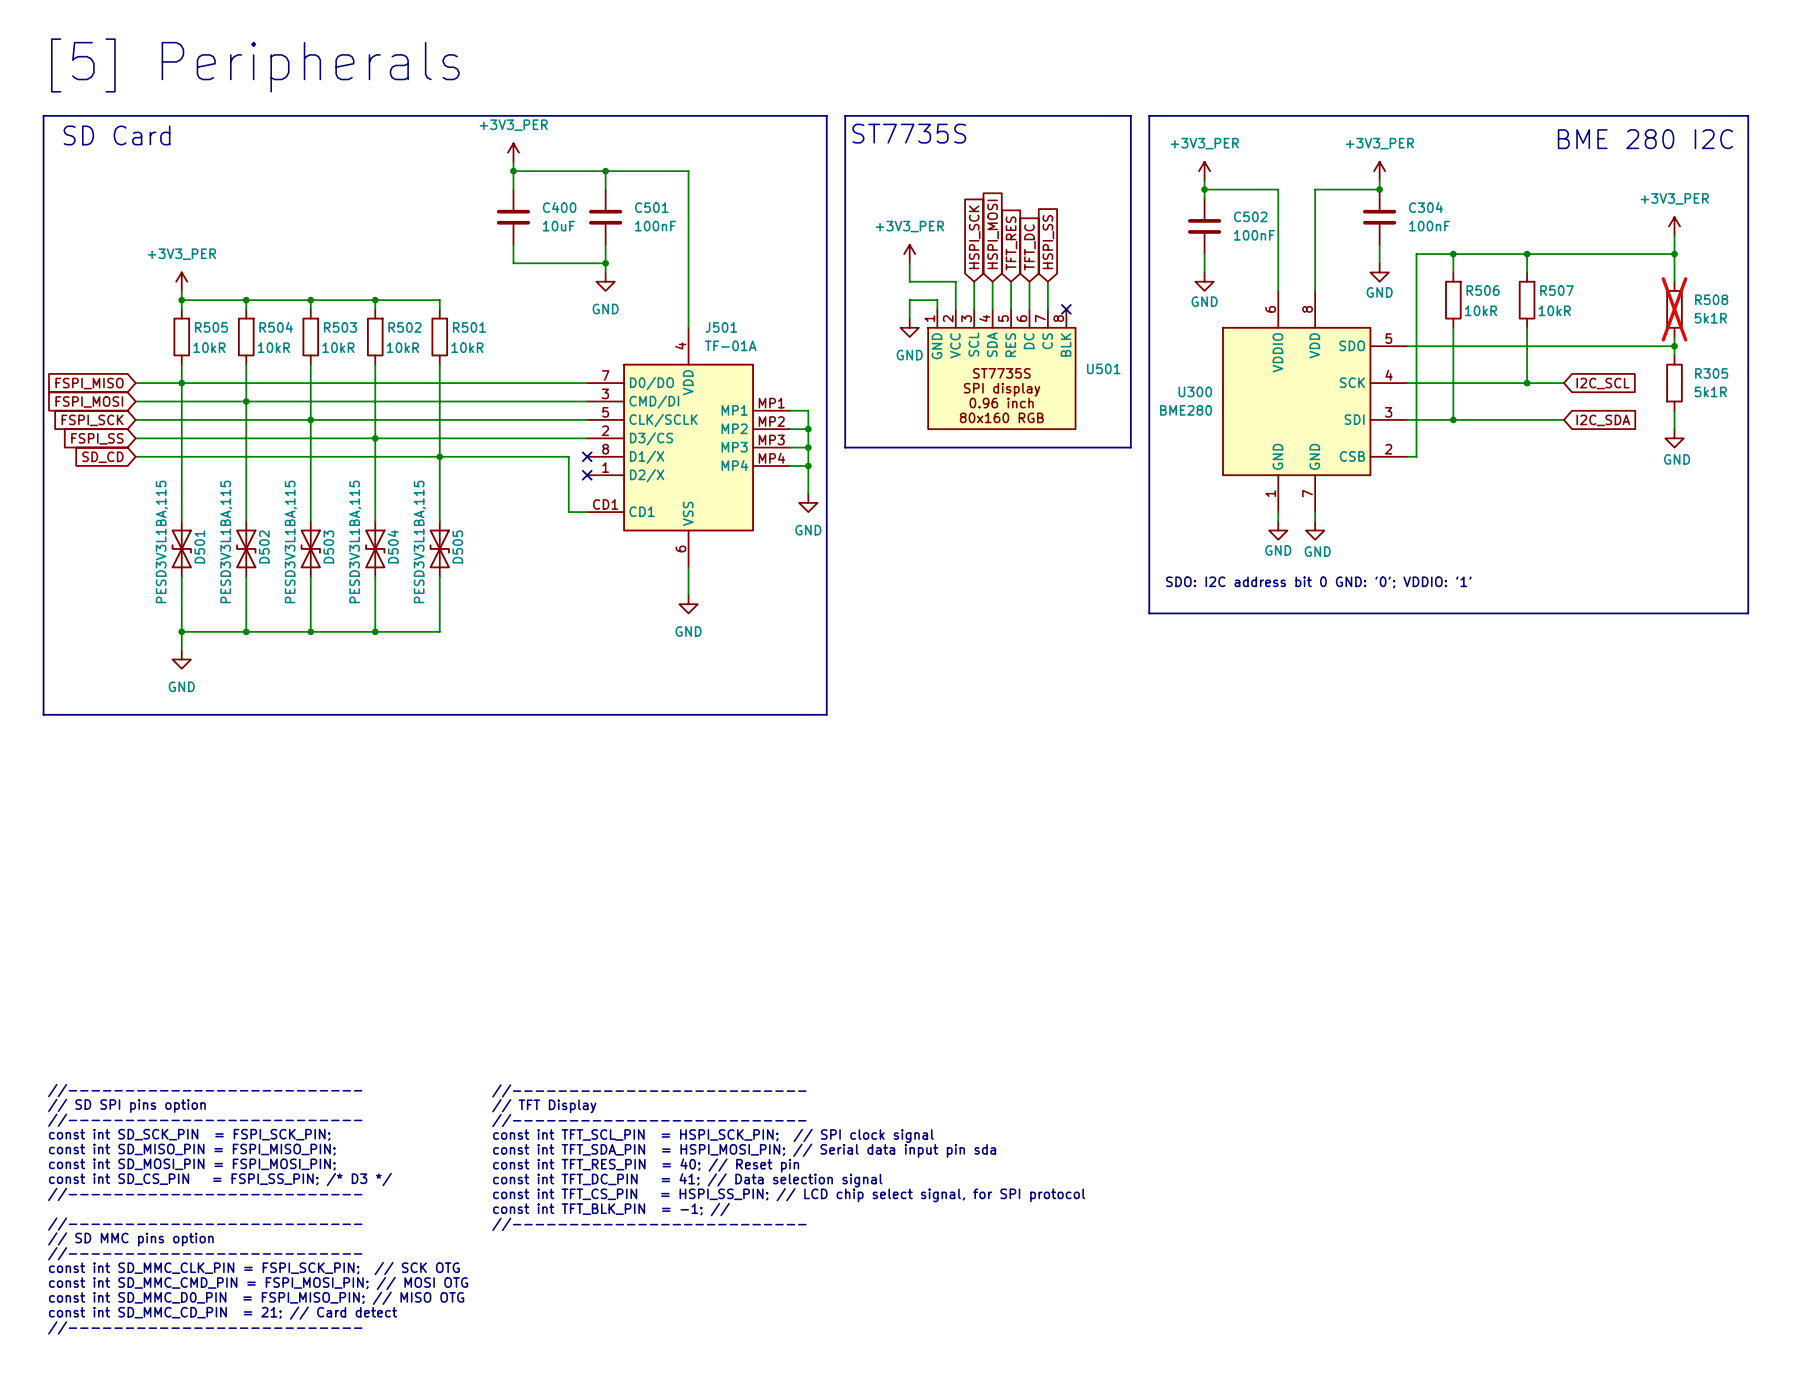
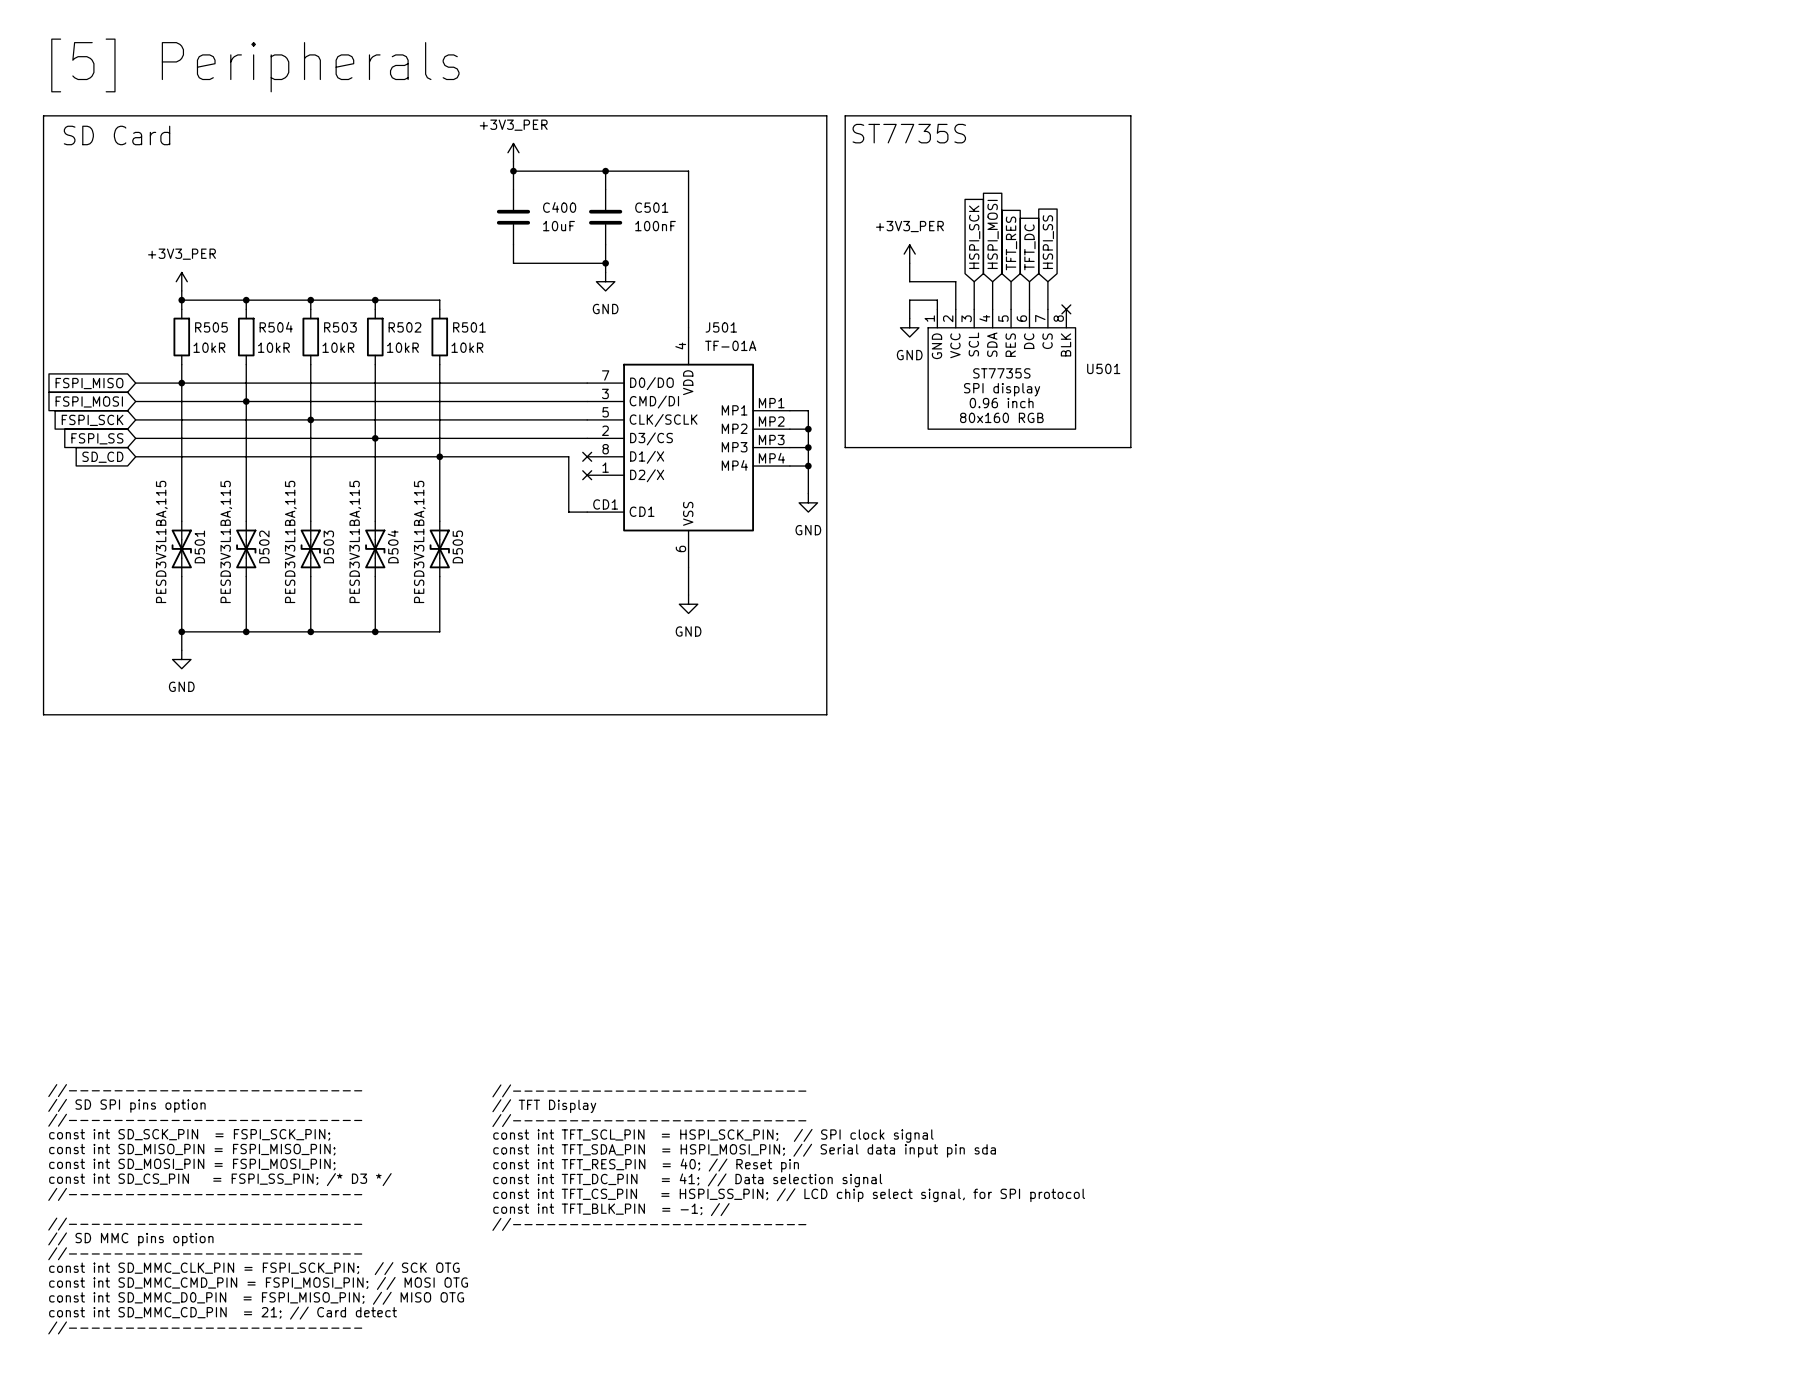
line: (1149, 115) (1748, 115) (1748, 613) (1149, 613) (1149, 115) -> none
text: BME 280 I2C (1645, 139) -> none
power symbol: +3V3_PER (1204, 171) -> none
power symbol: +3V3_PER (1379, 171) -> none
wire: (1204, 180) (1204, 198) -> none
wire: (1379, 180) (1379, 189) (1315, 189) (1315, 290) -> none
wire: (1204, 189) (1278, 189) (1278, 290) -> none
junction: (1204, 189) -> none
junction: (1379, 189) -> none
C304: 100nF (1379, 217) -> none
C502: 100nF (1204, 226) -> none
power symbol: +3V3_PER (1674, 226) -> none
wire: (1674, 235) (1674, 281) -> none
wire: (1379, 244) (1379, 263) -> none
wire: (1204, 254) (1204, 272) -> none
wire: (1453, 254) (1453, 272) -> none
junction: (1453, 254) -> none
wire: (1527, 254) (1527, 272) -> none
junction: (1527, 254) -> none
wire: (1674, 254) (1416, 254) (1416, 456) (1407, 456) -> none
junction: (1674, 254) -> none
power symbol: GND (1379, 272) -> none
power symbol: GND (1204, 281) -> none
R506: 10kR (1453, 300) -> none
R507: 10kR (1527, 300) -> none
R508: 5k1R (1674, 309) -> none
wire: (1453, 327) (1453, 419) -> none
wire: (1527, 327) (1527, 383) -> none
wire: (1674, 337) (1674, 355) -> none
wire: (1407, 346) (1674, 346) -> none
junction: (1674, 346) -> none
wire: (1407, 383) (1563, 383) -> none
junction: (1527, 383) -> none
global label: I2C_SCL (1603, 383) -> none
R305: 5k1R (1674, 383) -> none
U300: BME280 (1314, 401) -> none
wire: (1674, 410) (1674, 429) -> none
wire: (1407, 419) (1563, 419) -> none
junction: (1453, 419) -> none
global label: I2C_SDA (1603, 420) -> none
power symbol: GND (1674, 438) -> none
wire: (1278, 512) (1278, 521) -> none
wire: (1315, 512) (1315, 521) -> none
power symbol: GND (1278, 530) -> none
power symbol: GND (1315, 530) -> none
text: SDO: I2C address bit 0 GND: '0'; VDDIO: '1' (1318, 582) -> none

